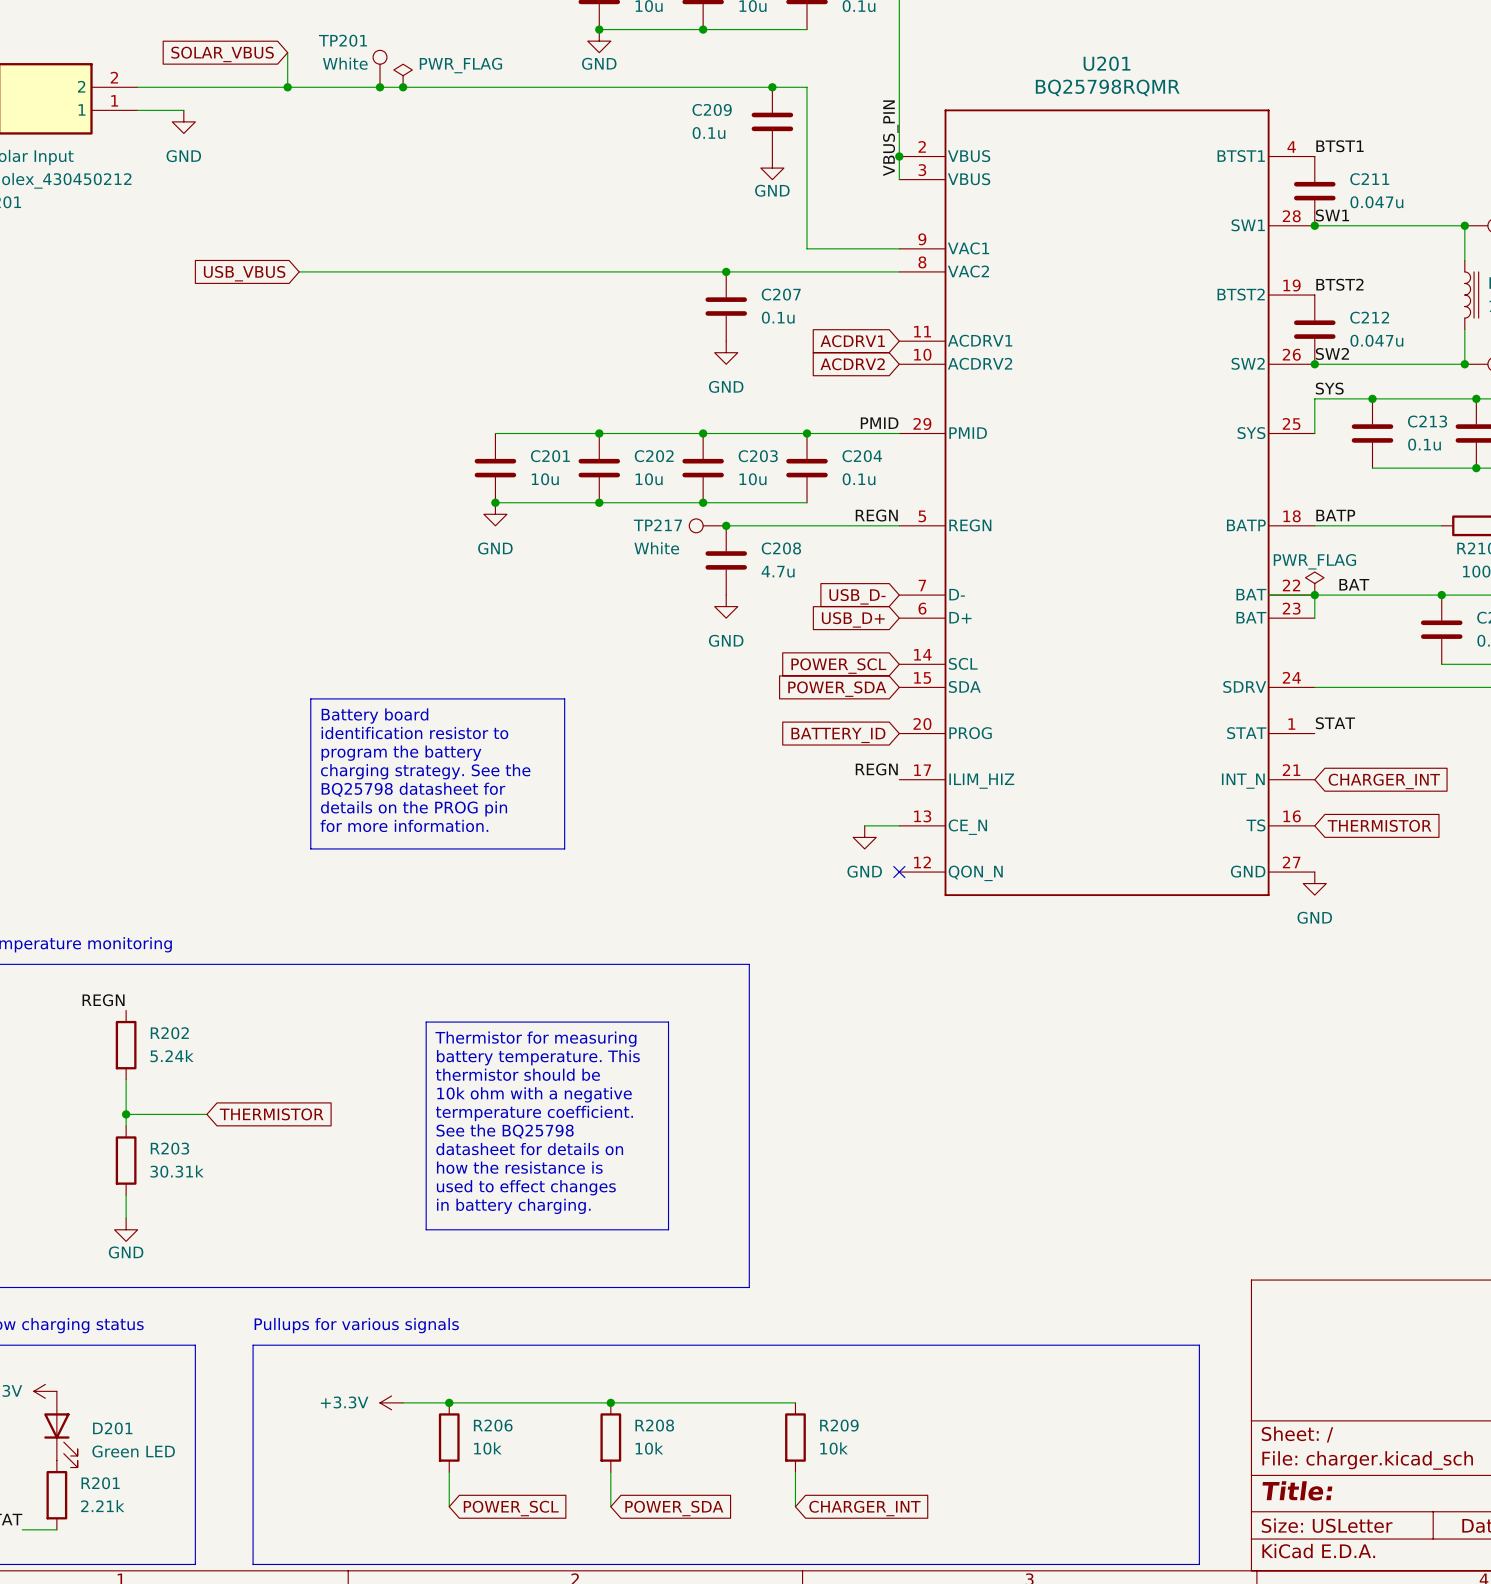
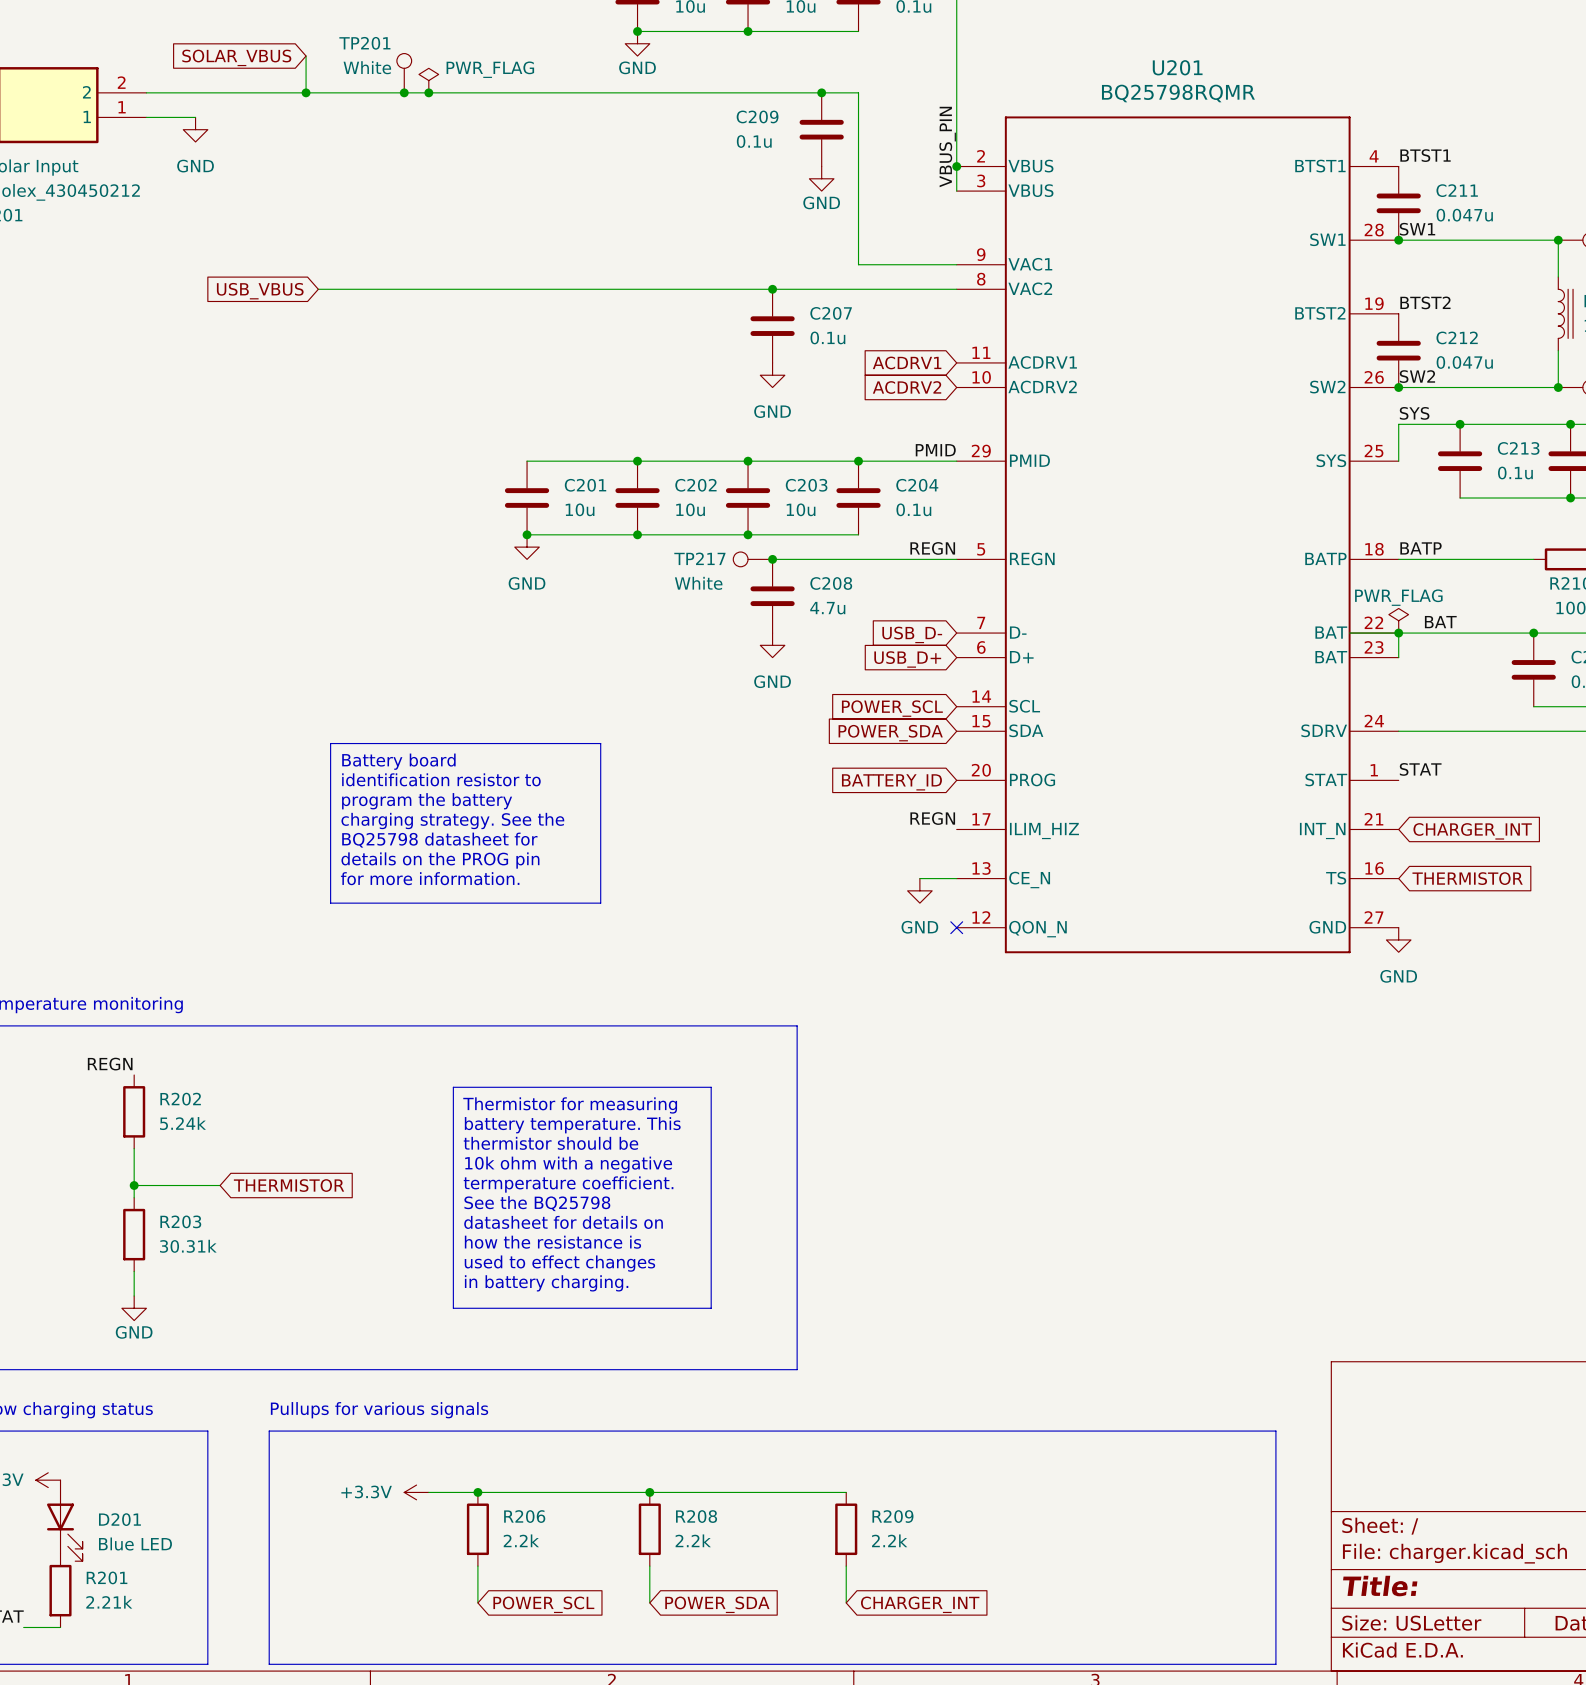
R206 value: 10k (487, 1448) -> 2.2k (521, 1540)
R208 value: 10k (649, 1448) -> 2.2k (693, 1540)
R209 value: 10k (834, 1448) -> 2.2k (889, 1540)
D201 value: Green LED (133, 1451) -> Blue LED (135, 1544)

